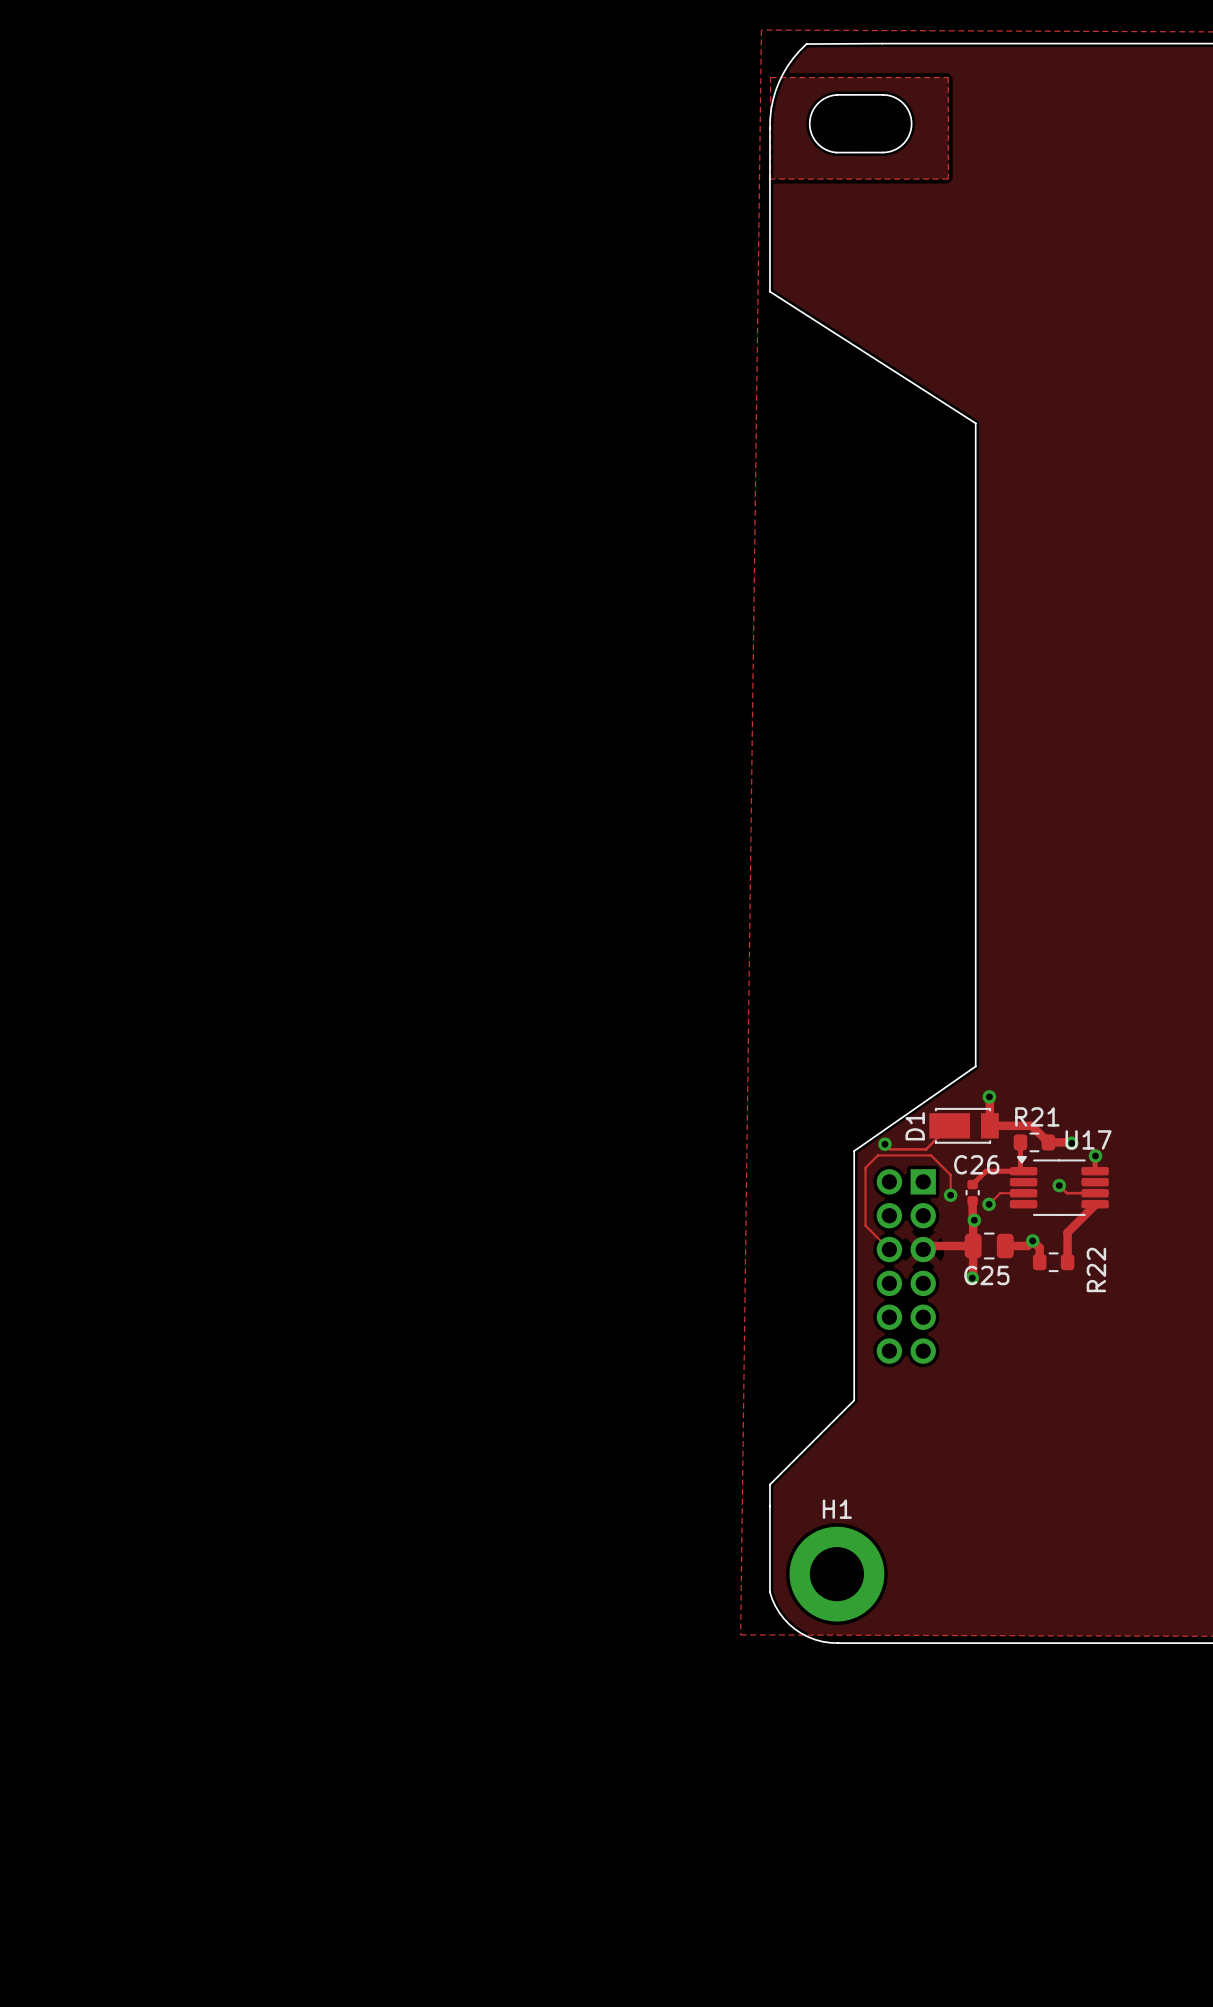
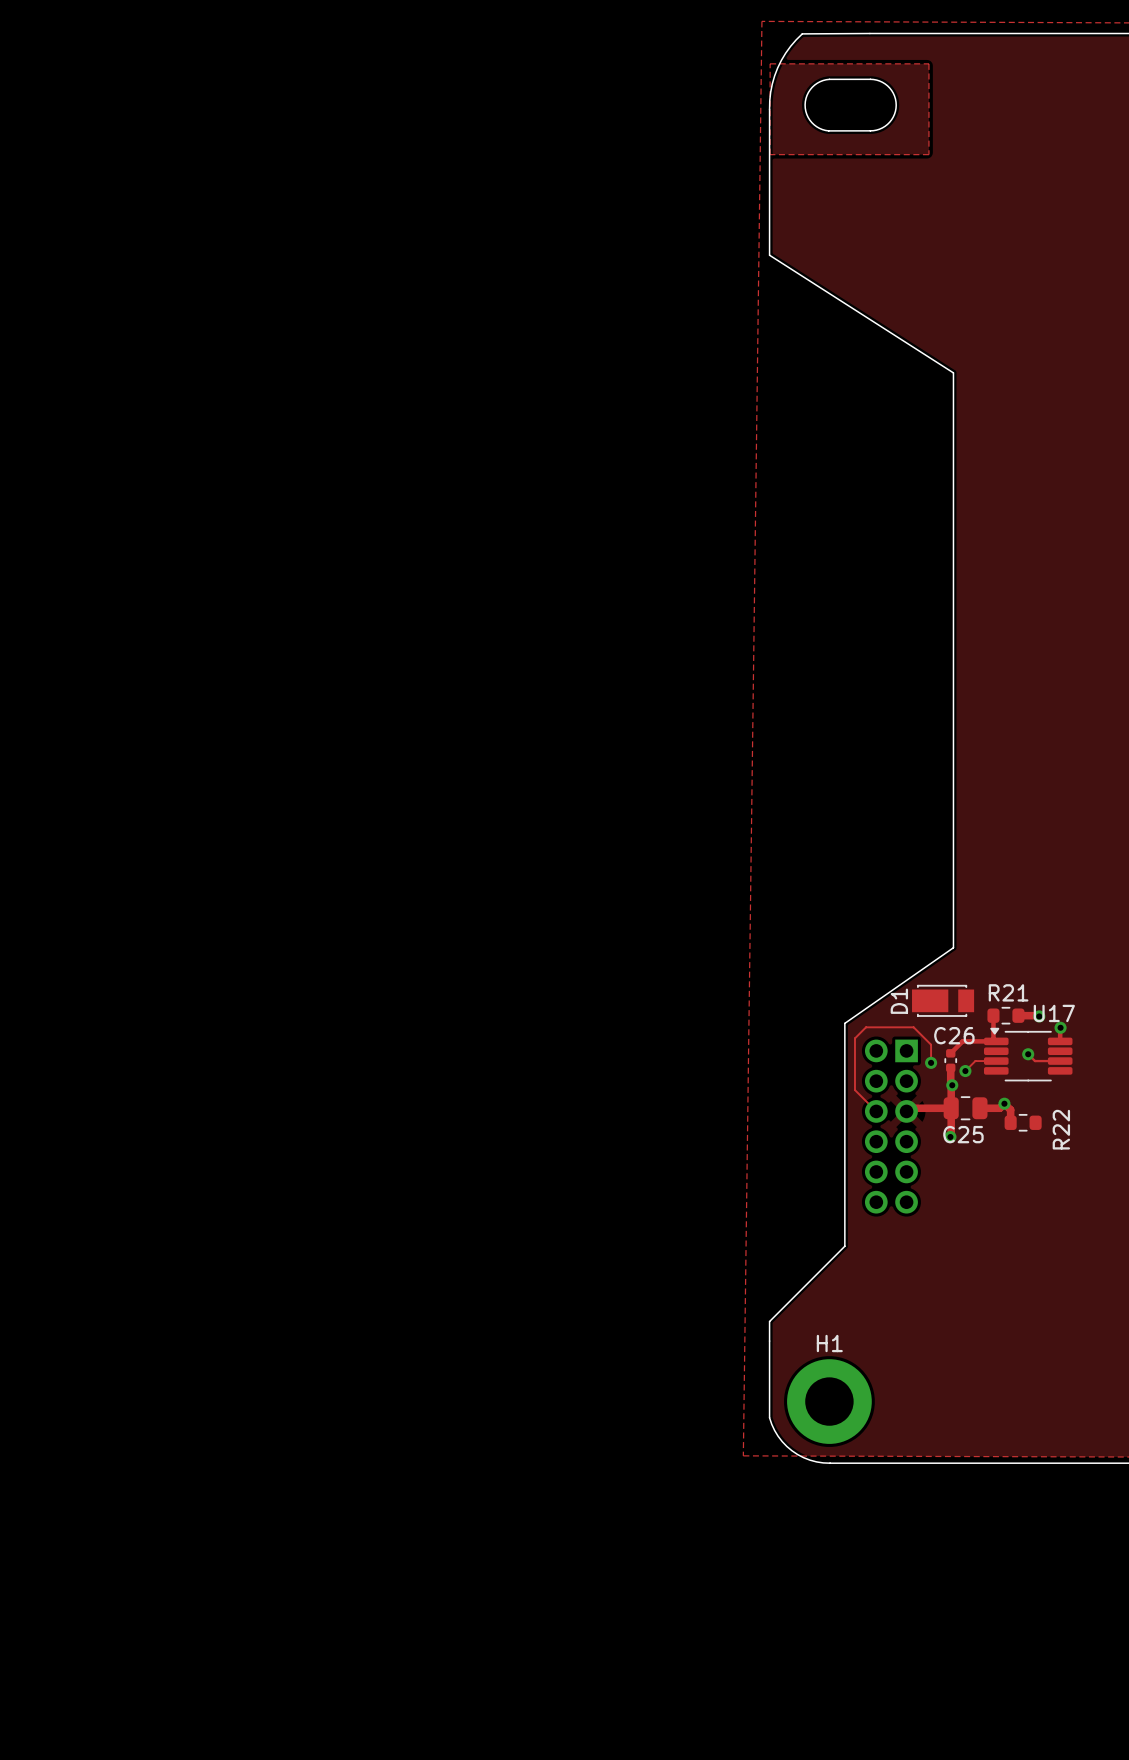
track: (989, 1096) (989, 1125) (1031, 1125) (1048, 1142) -> none
via: (989, 1096) -> none
track: (949, 1125) (926, 1149) (890, 1149) (884, 1144) -> none
via: (884, 1144) -> none
track: (1095, 1205) (1067, 1232) (1067, 1262) -> none

